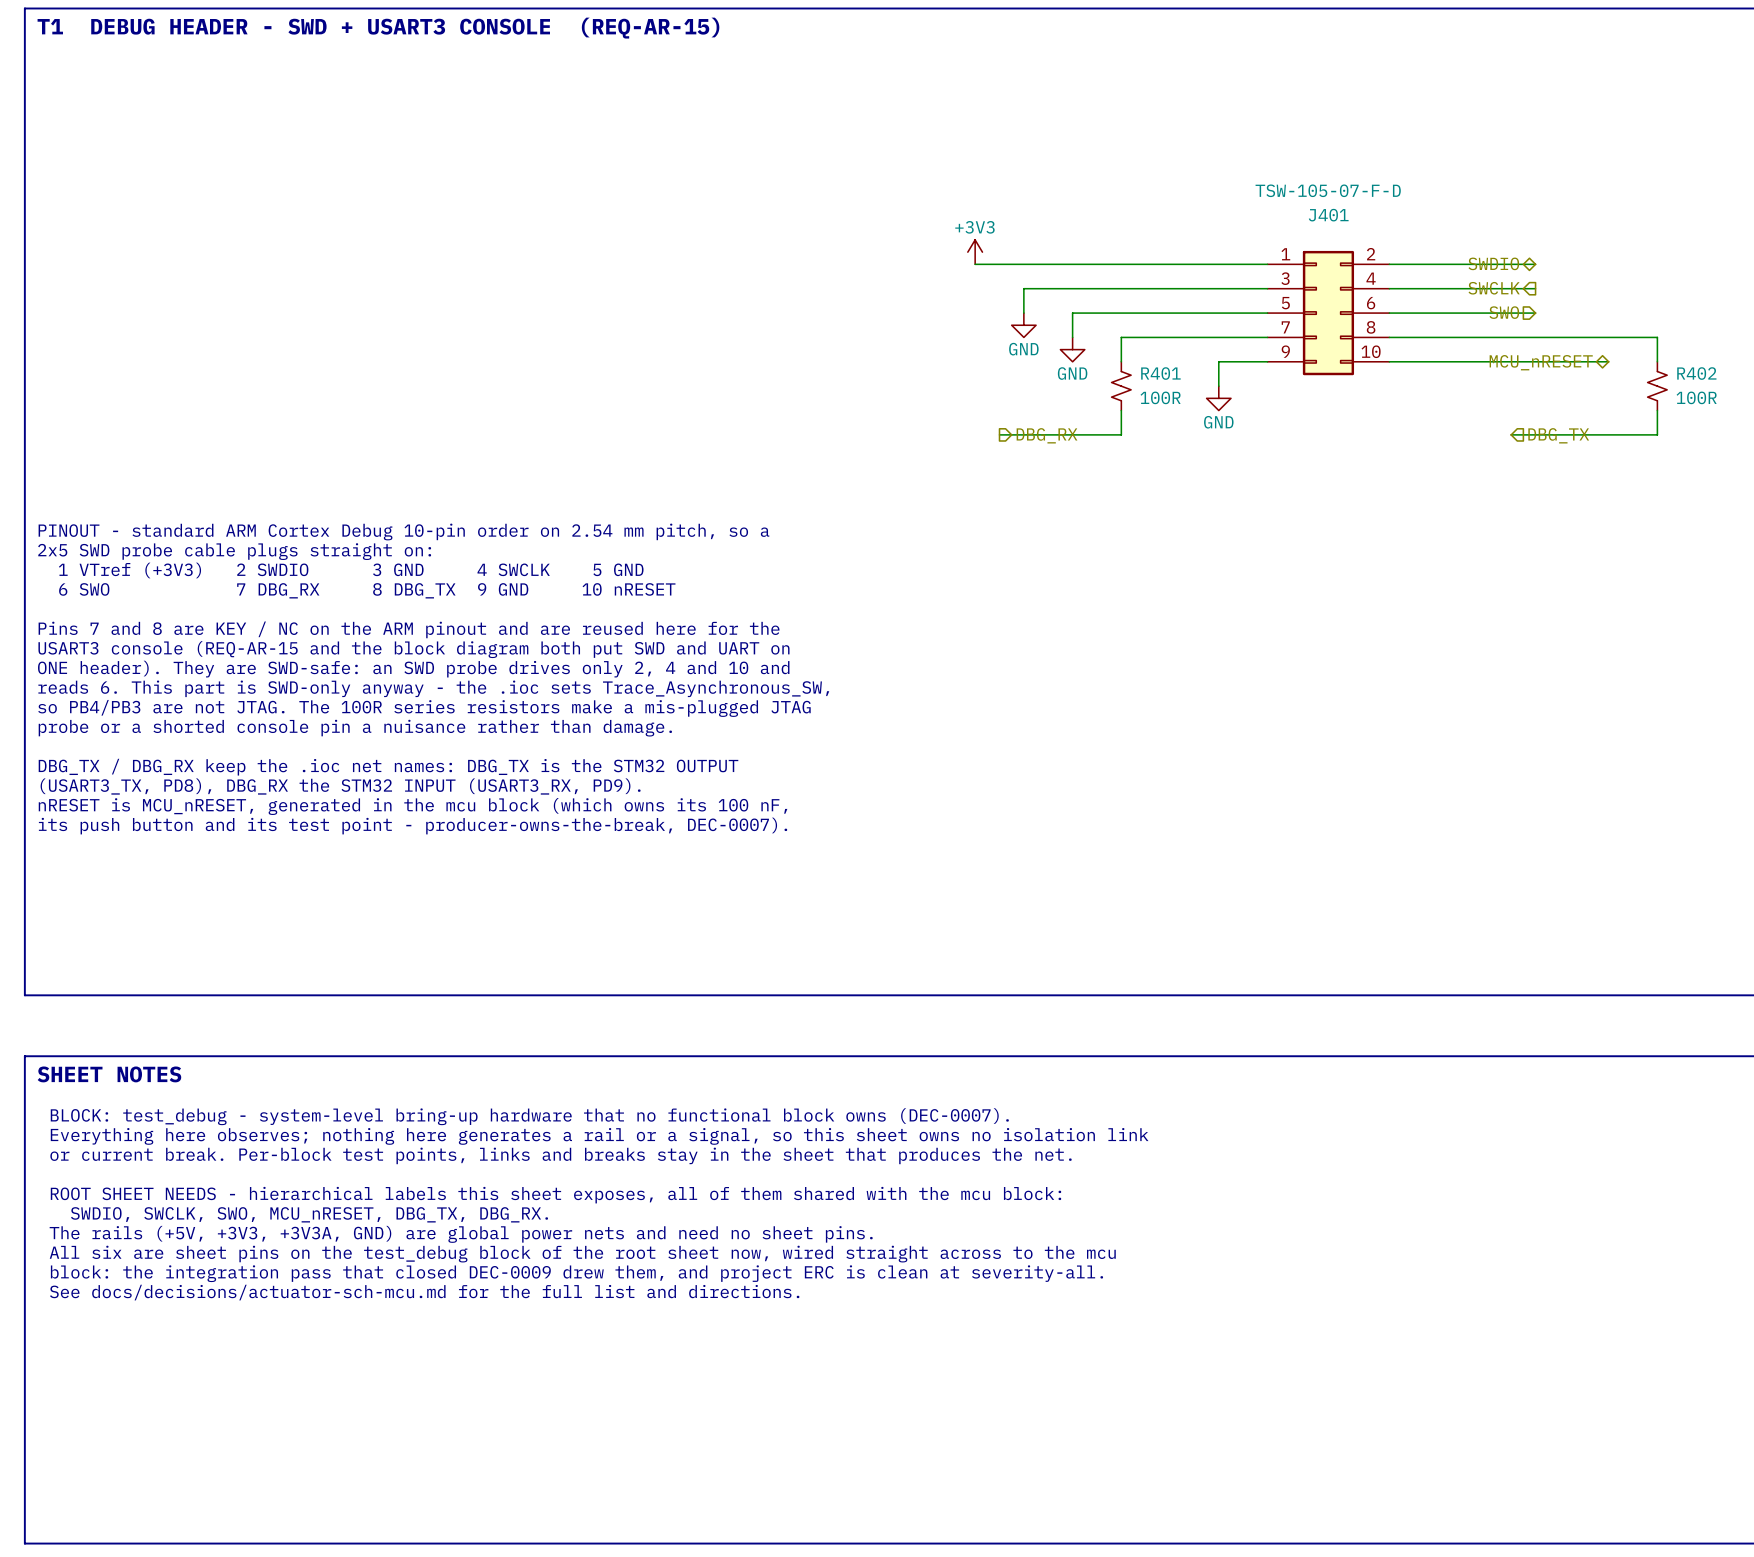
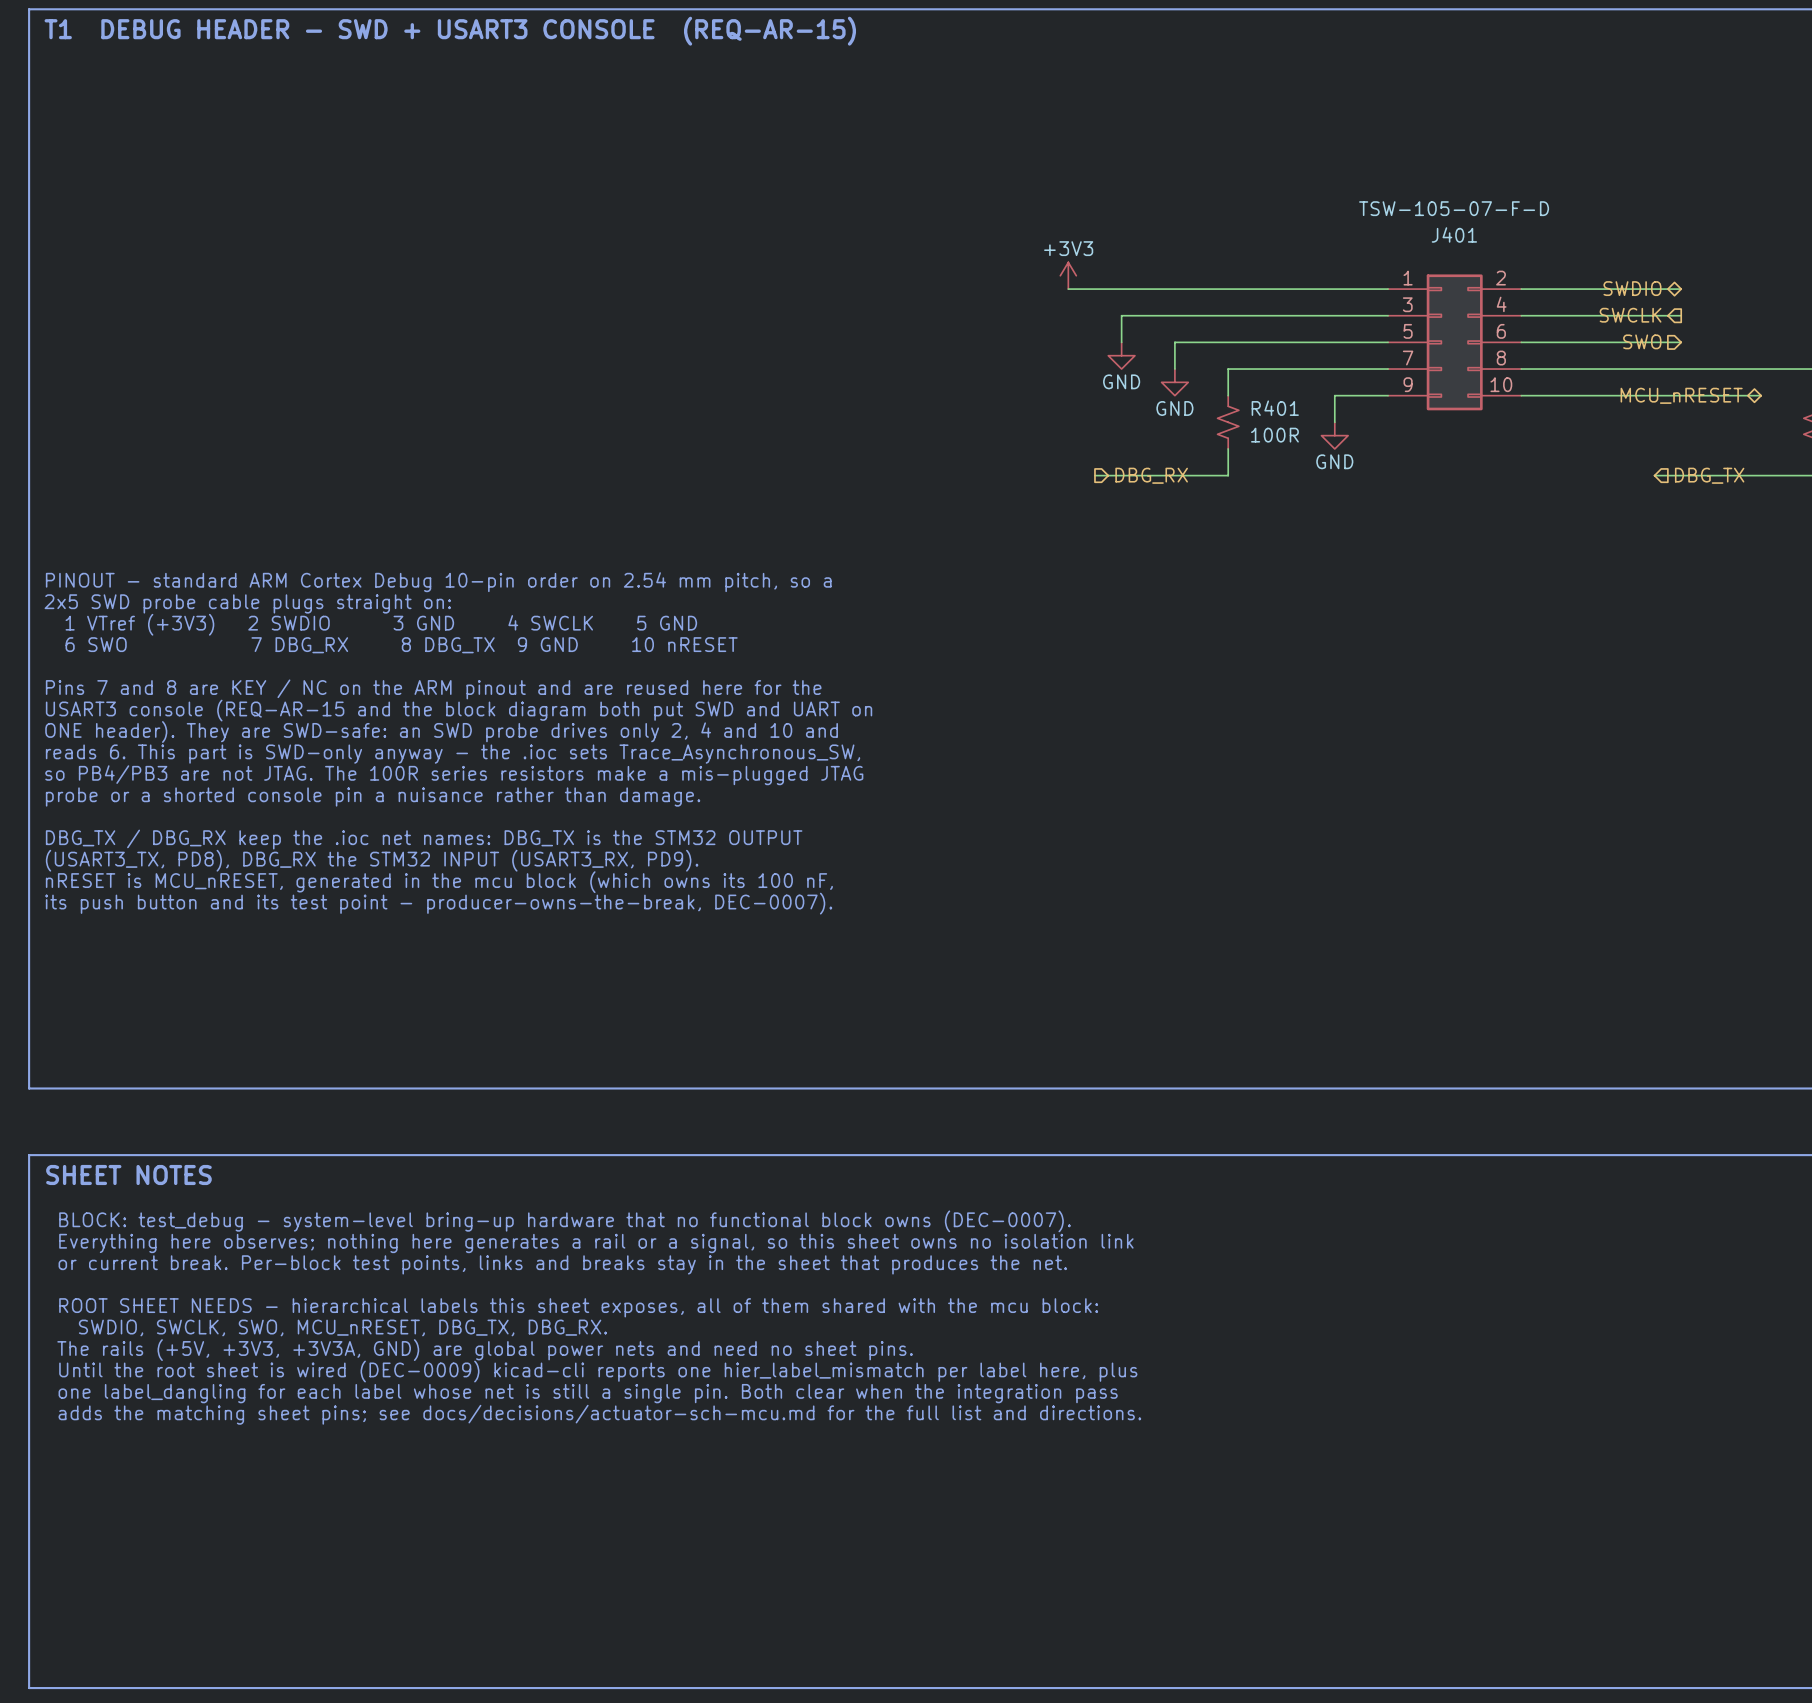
text: All six are sheet pins on the test_debug block of the root sheet now, wired straight across to the mcu (582, 1254) -> Until the root sheet is wired (DEC-0009) kicad-cli reports one hier_label_mismatch per label here, plus (598, 1371)
text: block: the integration pass that closed DEC-0009 drew them, and project ERC is clean at severity-all. (576, 1273) -> one label_dangling for each label whose net is still a single pin. Both clear when the integration pass (588, 1393)
text: See docs/decisions/actuator-sch-mcu.md for the full list and directions. (424, 1292) -> adds the matching sheet pins; see docs/decisions/actuator-sch-mcu.md for the full list and directions. (599, 1414)

